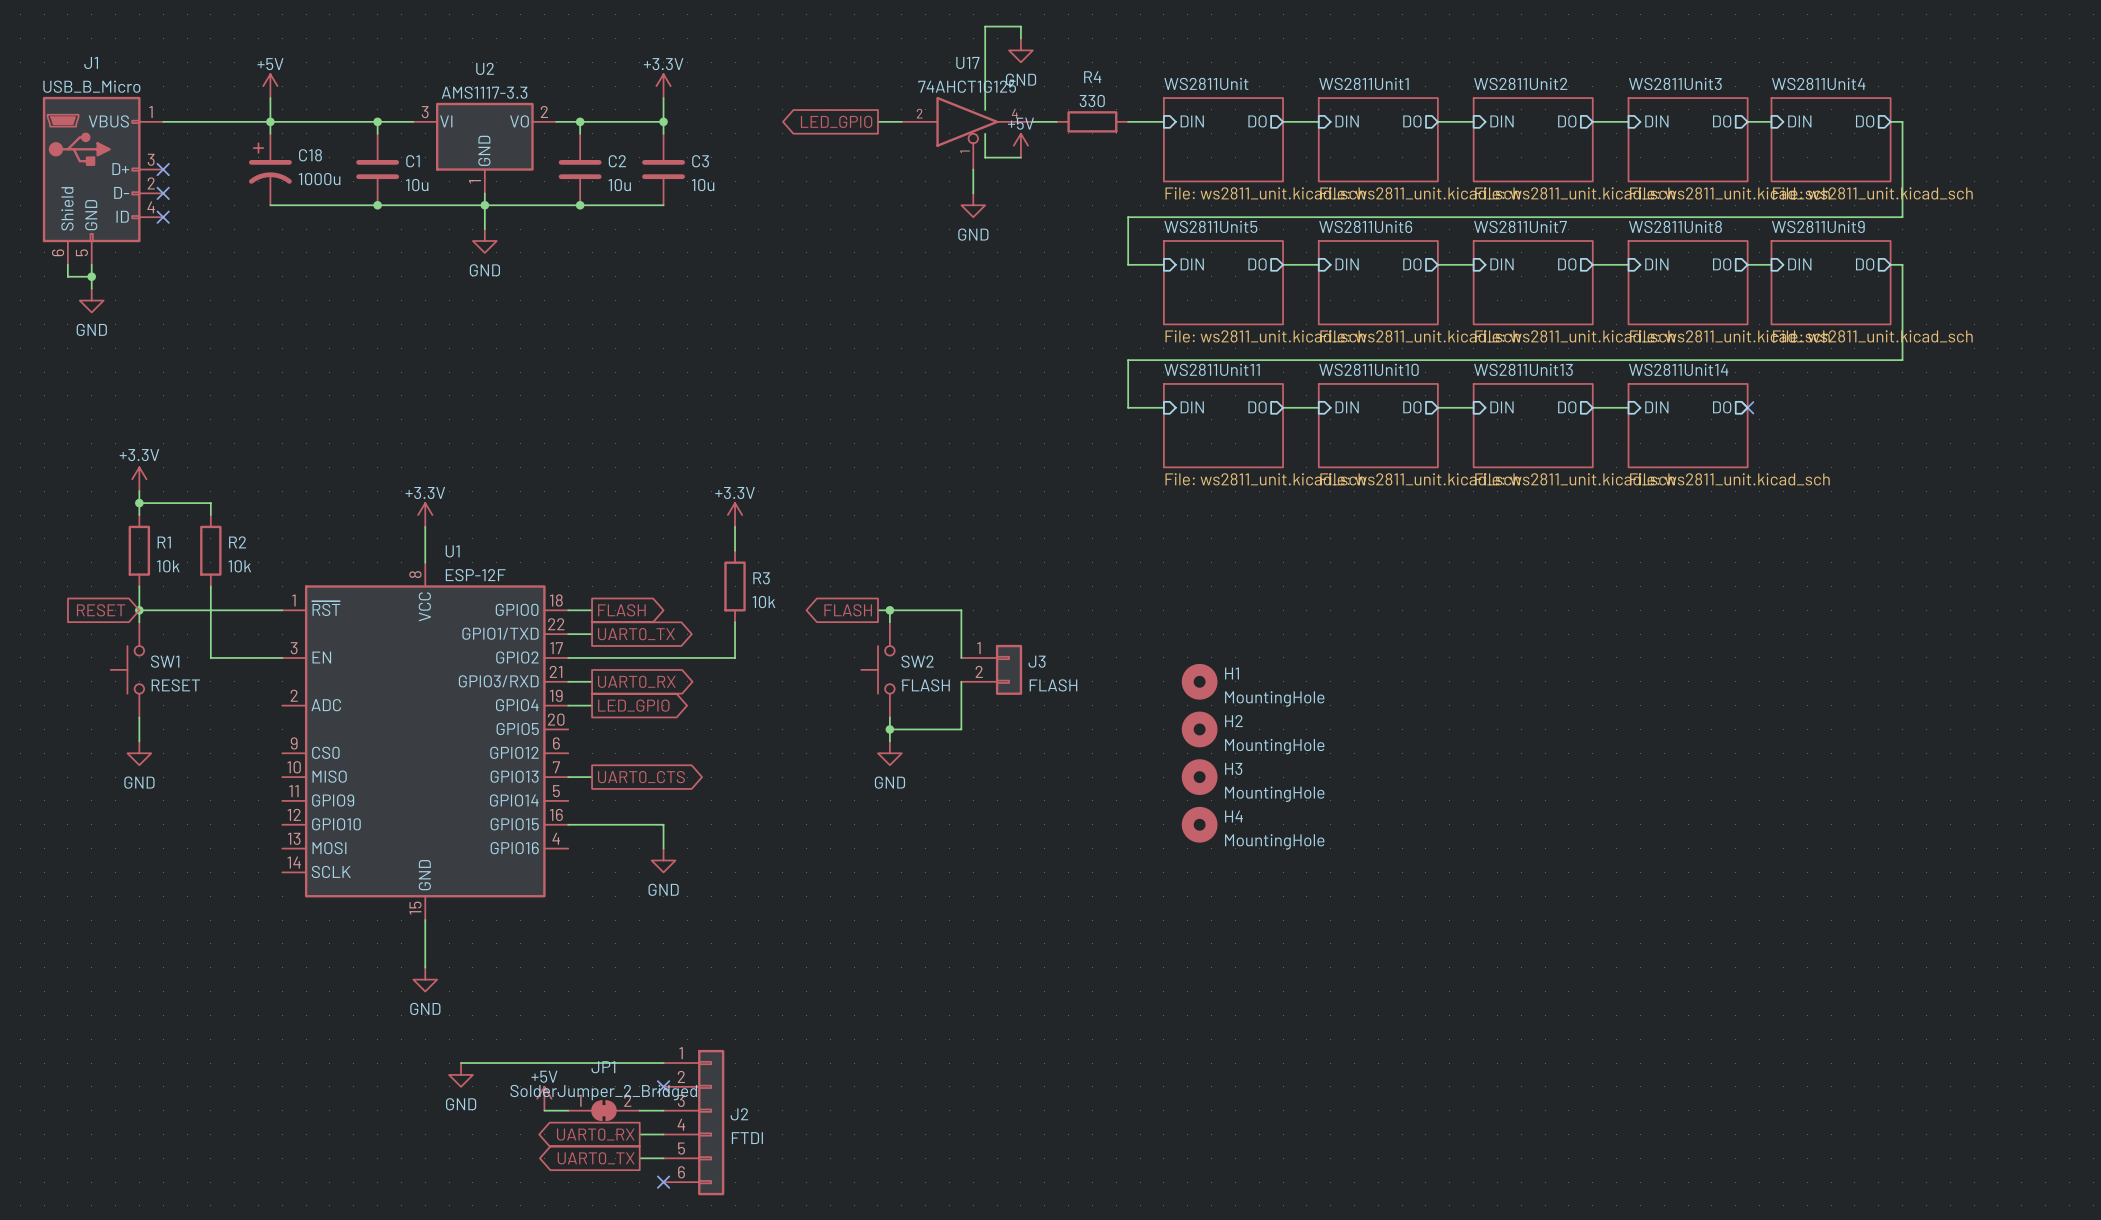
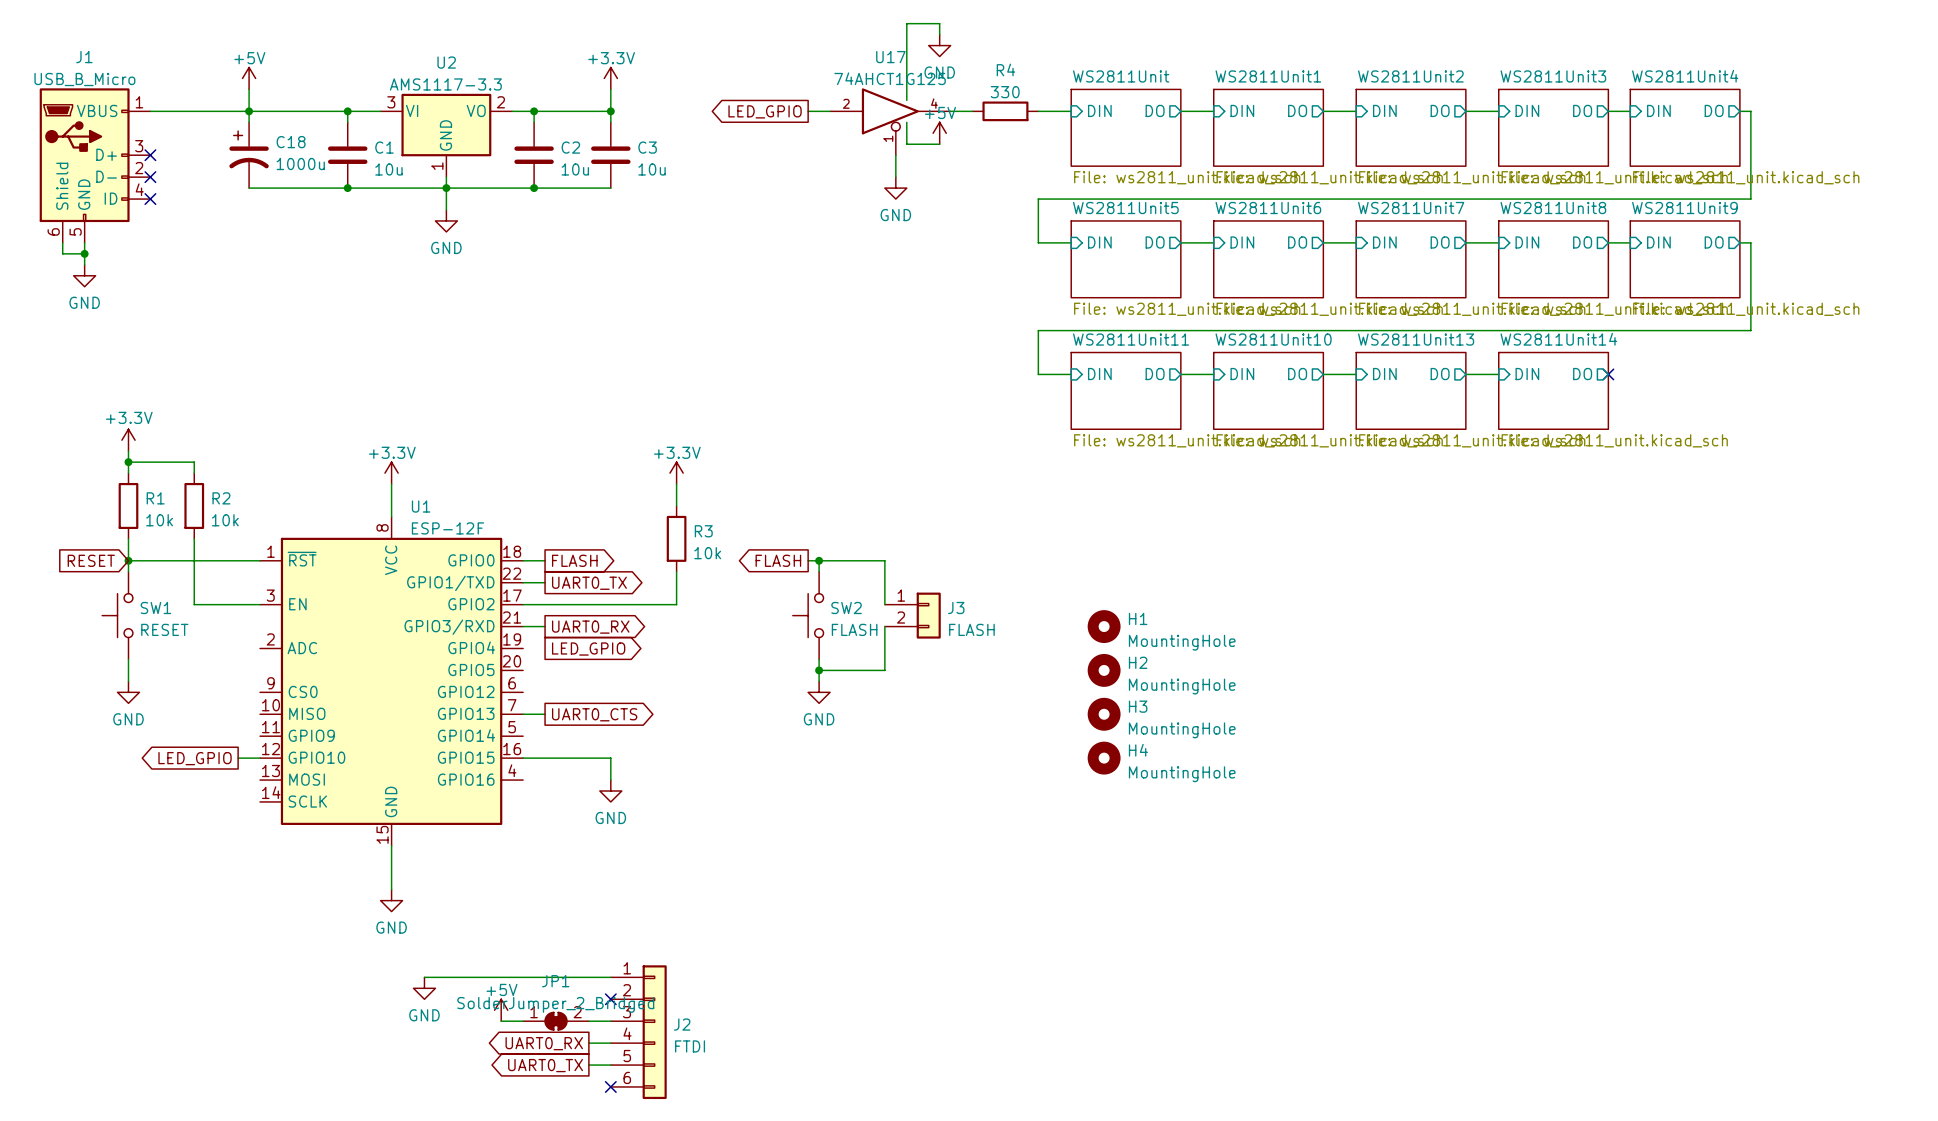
wire: (568, 705) (592, 705) -> none
global label: none -> LED_GPIO (195, 758)
wire: none -> (238, 758) (260, 758)

